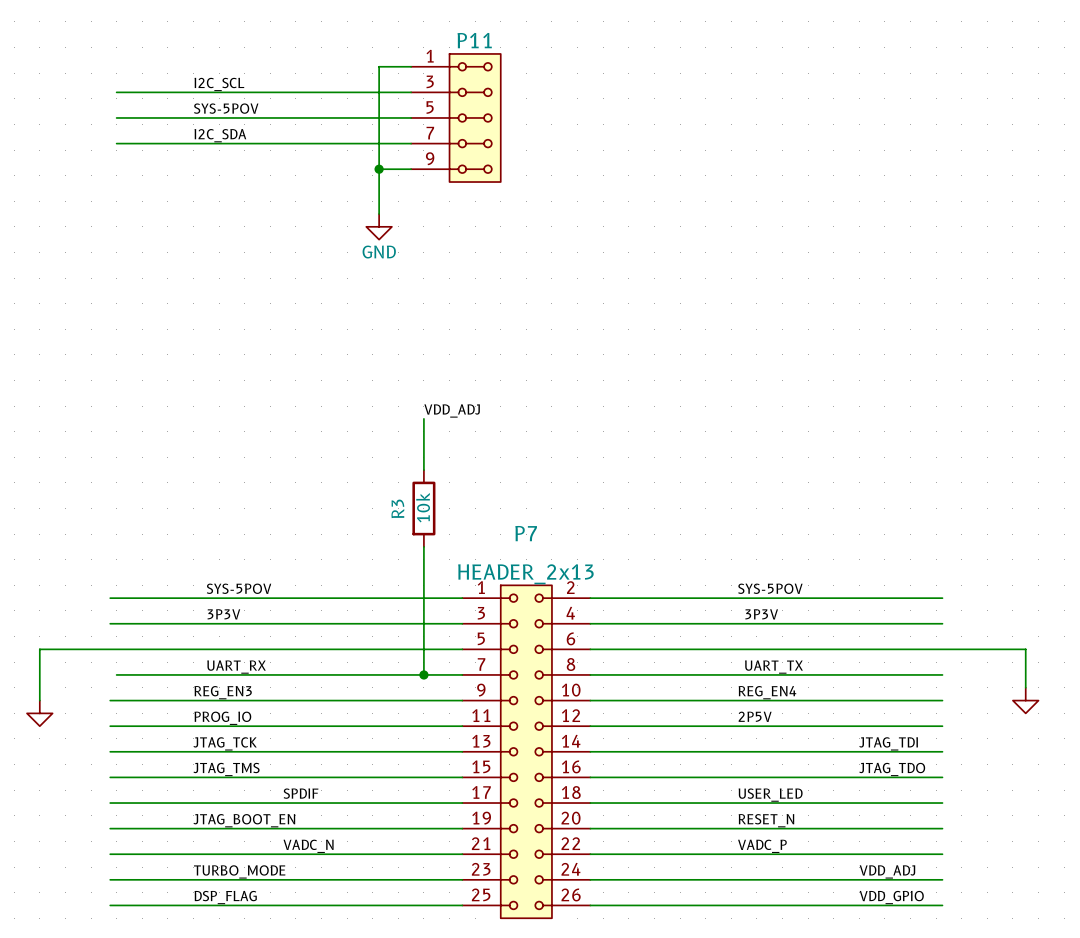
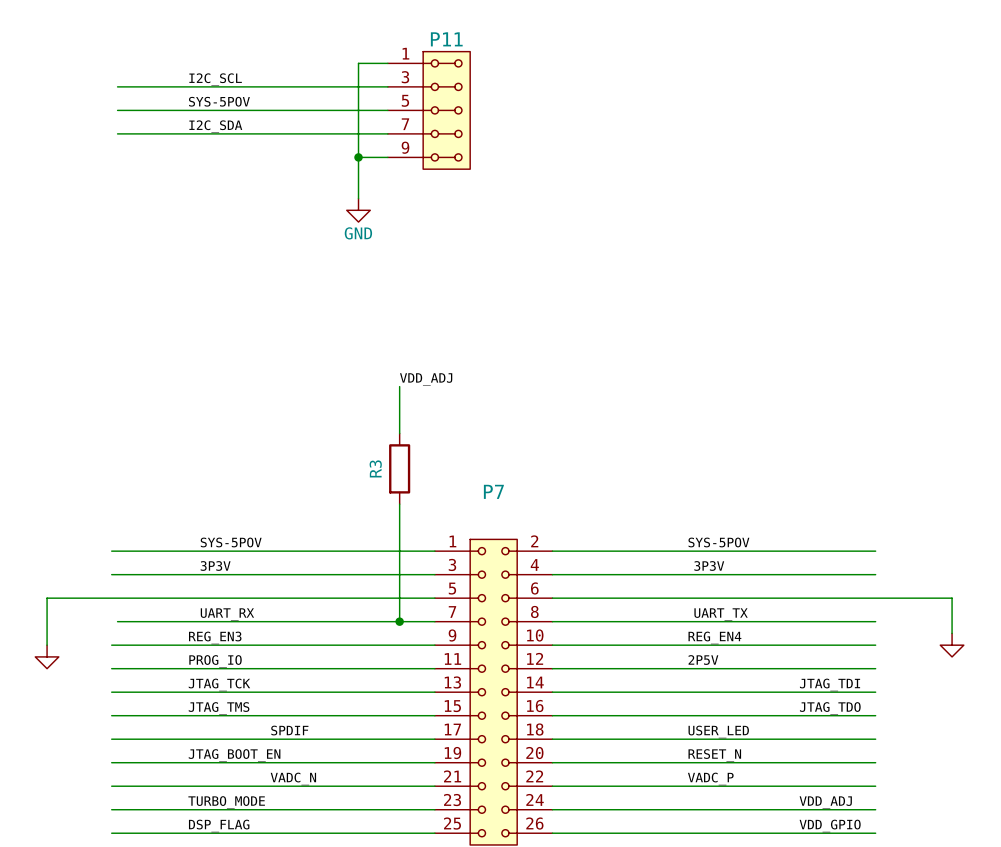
R3 value: 10k (423, 507) -> none
P7 value: HEADER_2x13 (525, 574) -> none

